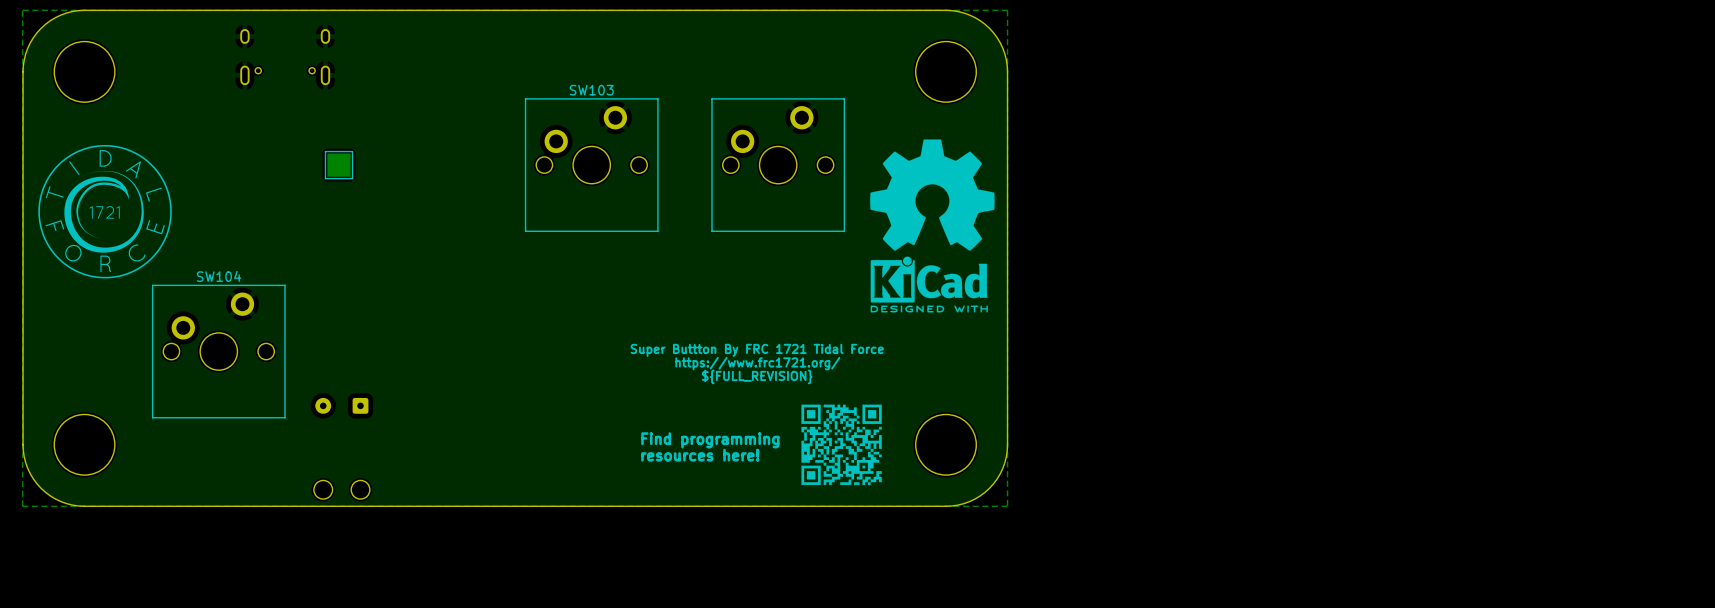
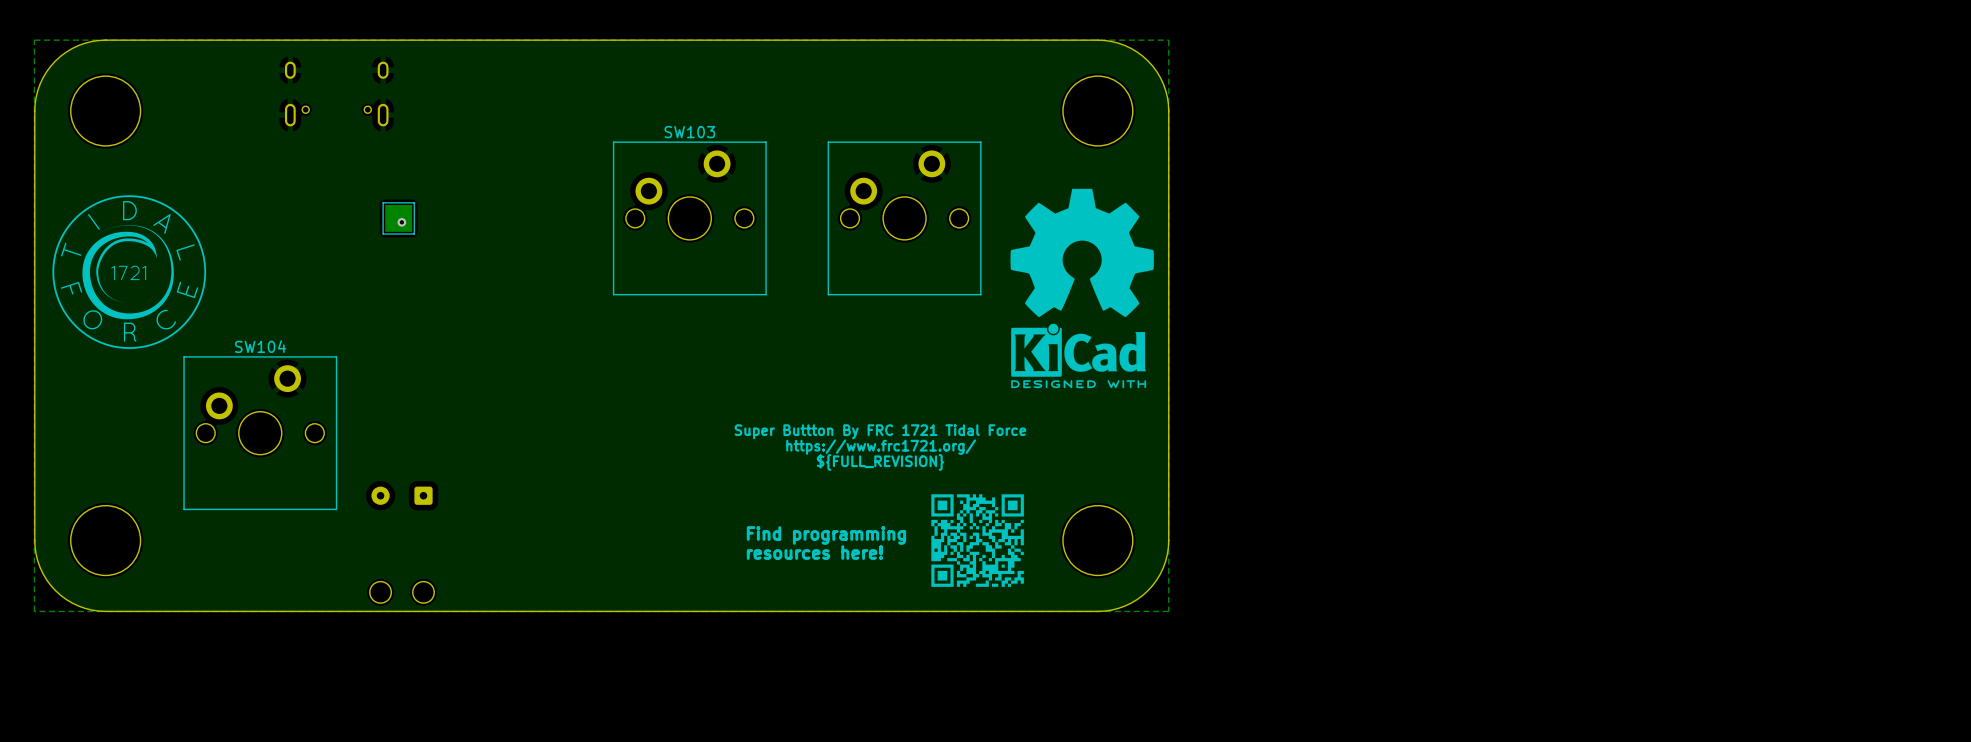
via: none -> (401, 222)

